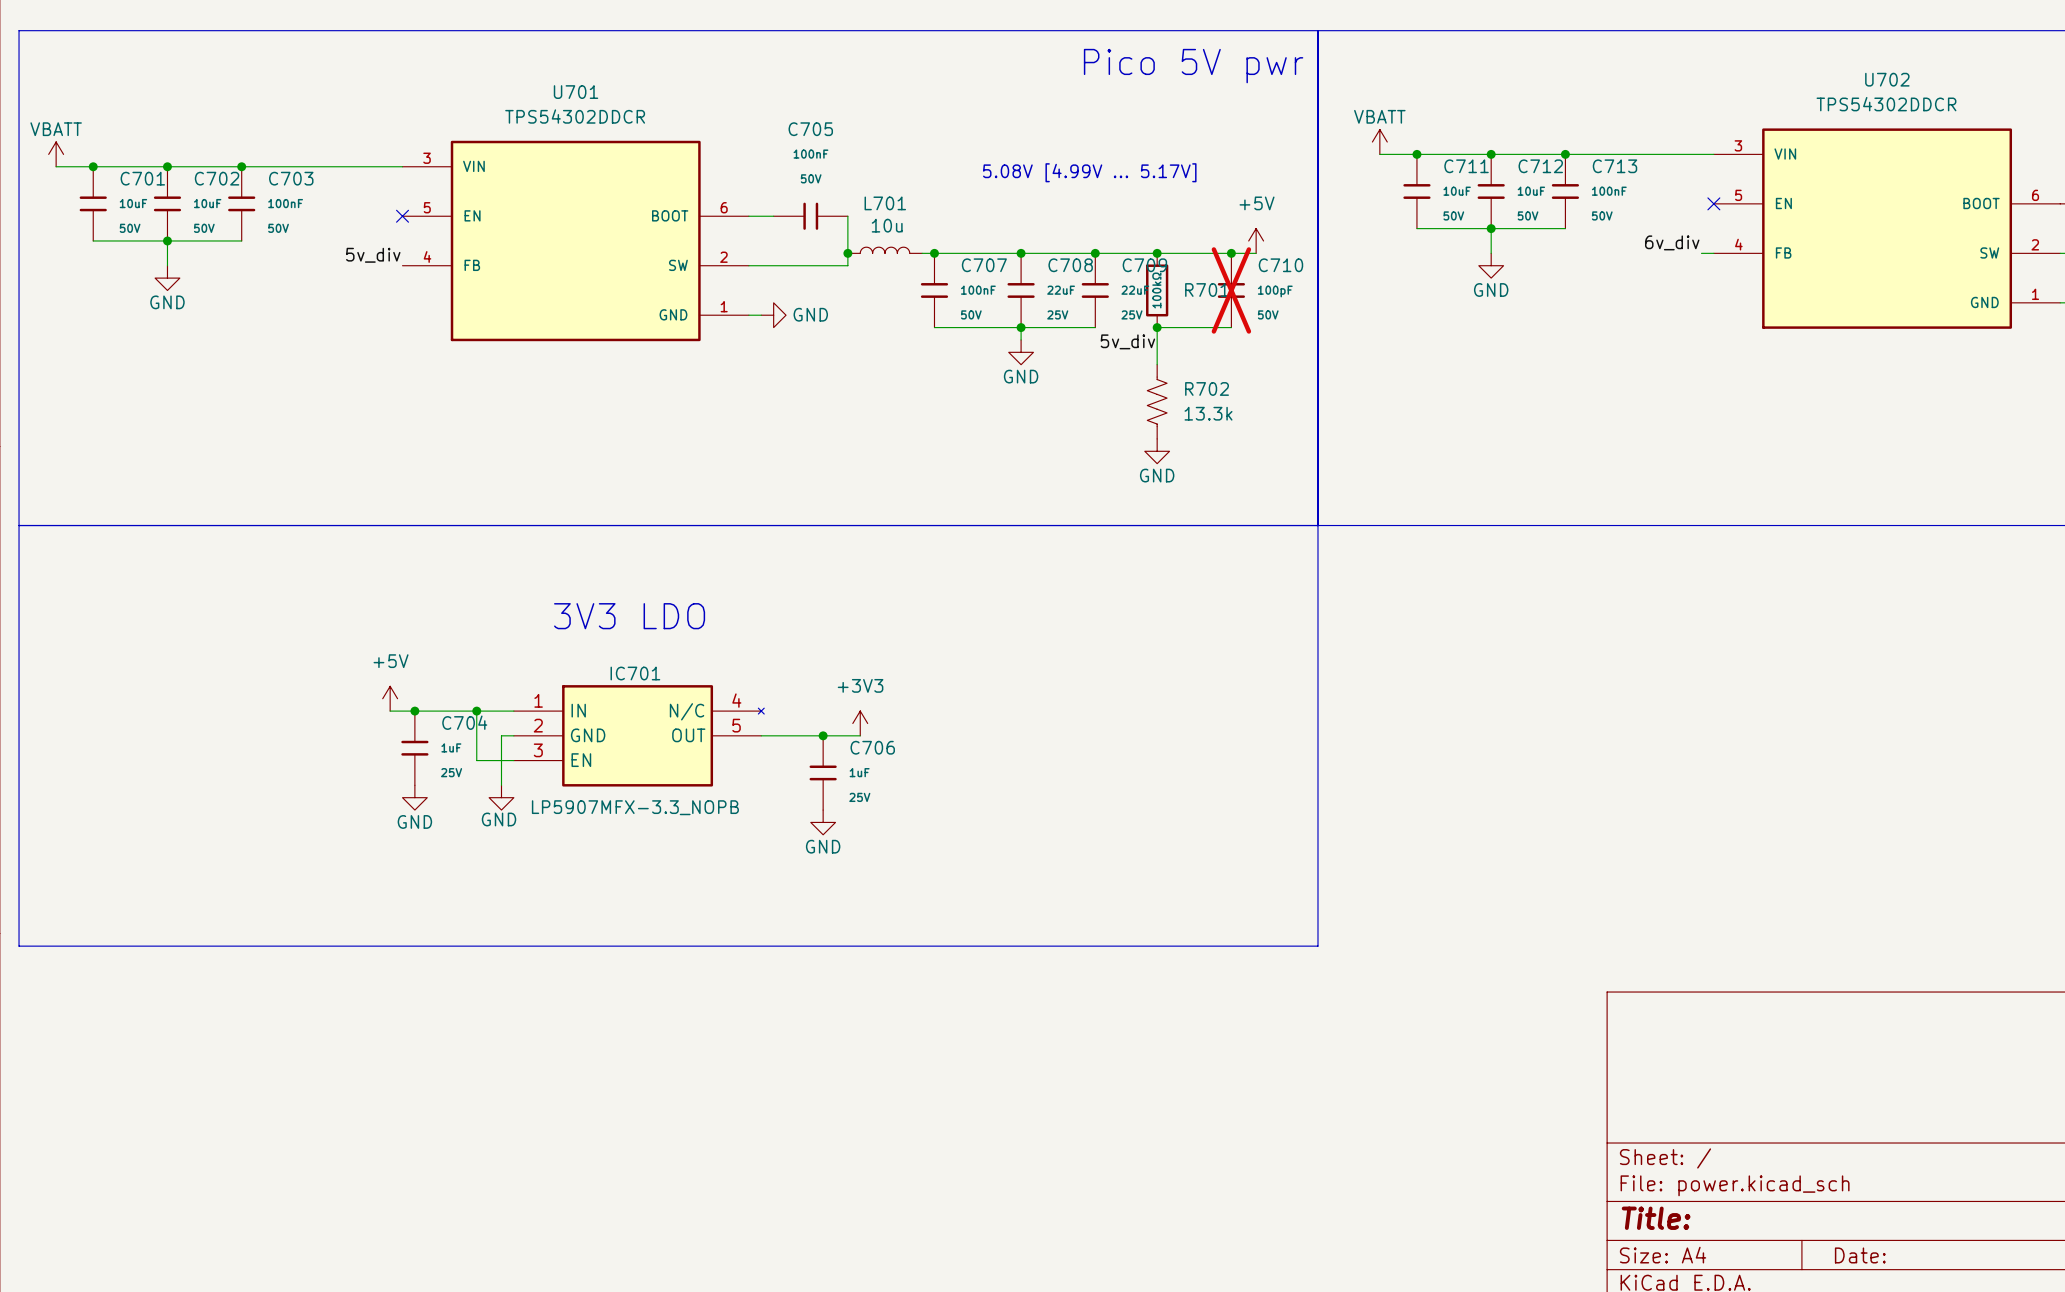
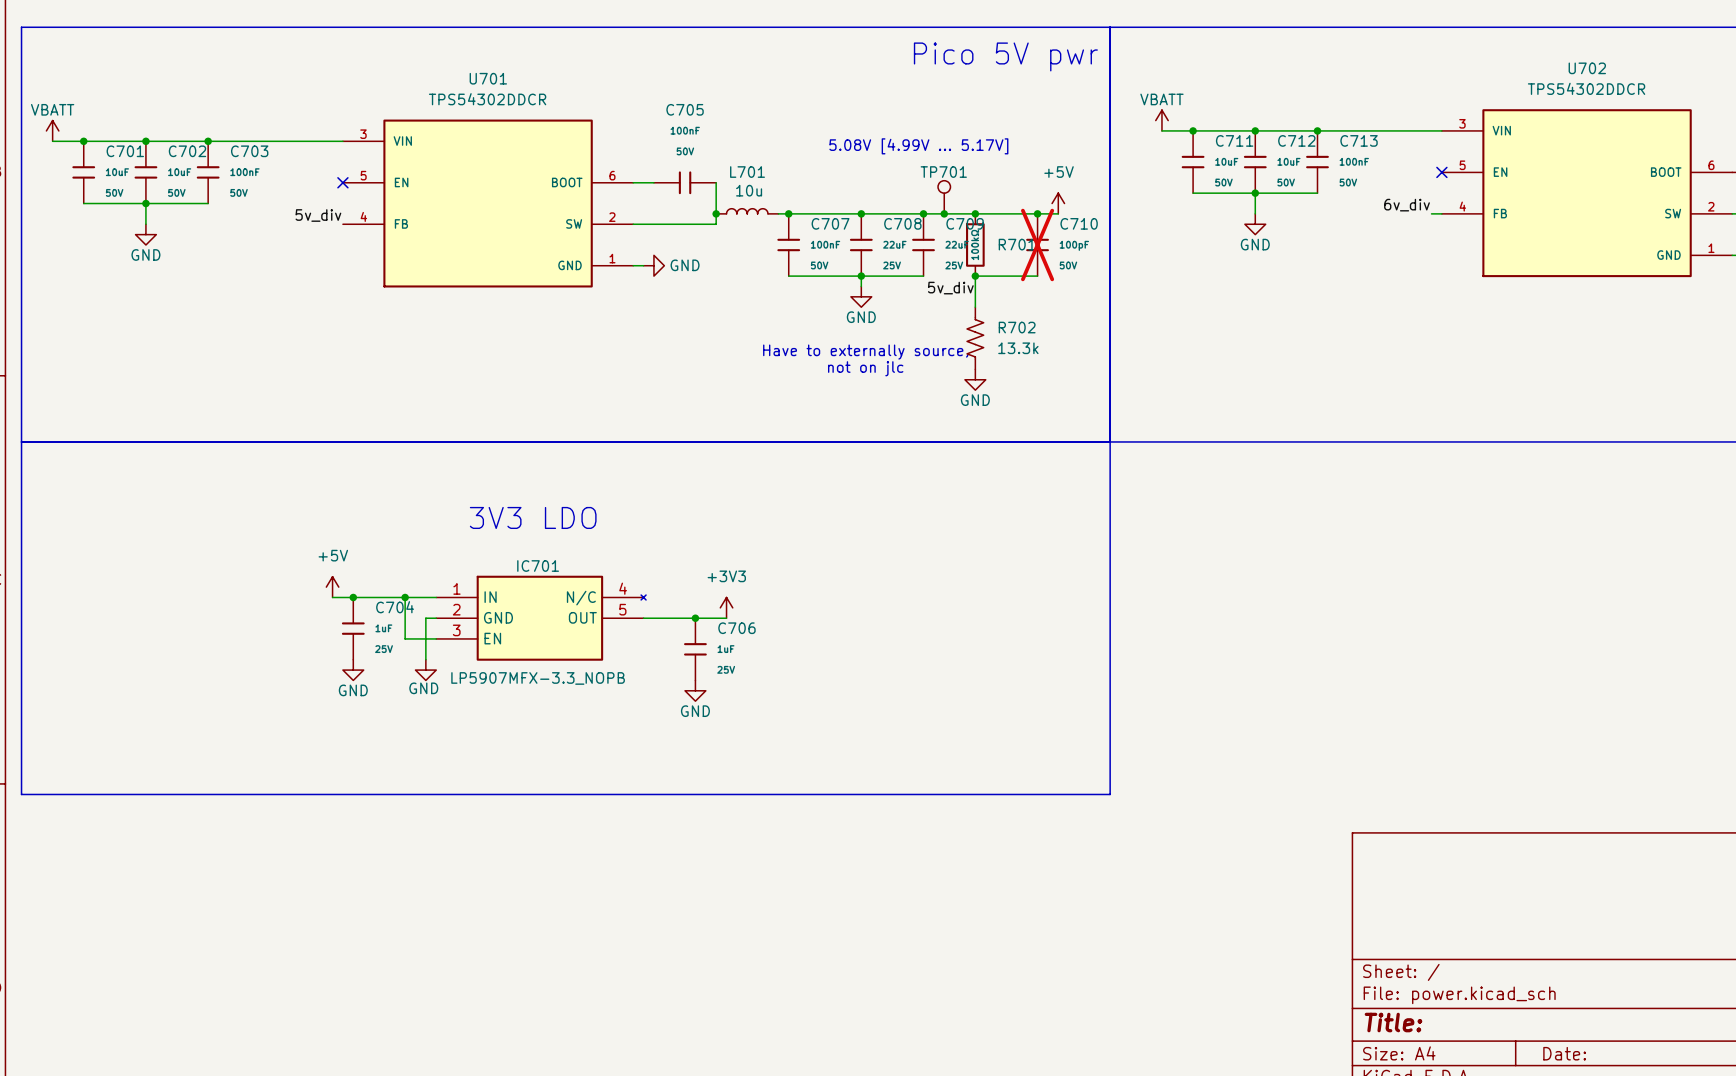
TP701: none -> (944, 197)
junction: none -> (944, 213)
text: none -> Have to externally source, (865, 352)
text: none -> not on jlc (865, 368)

